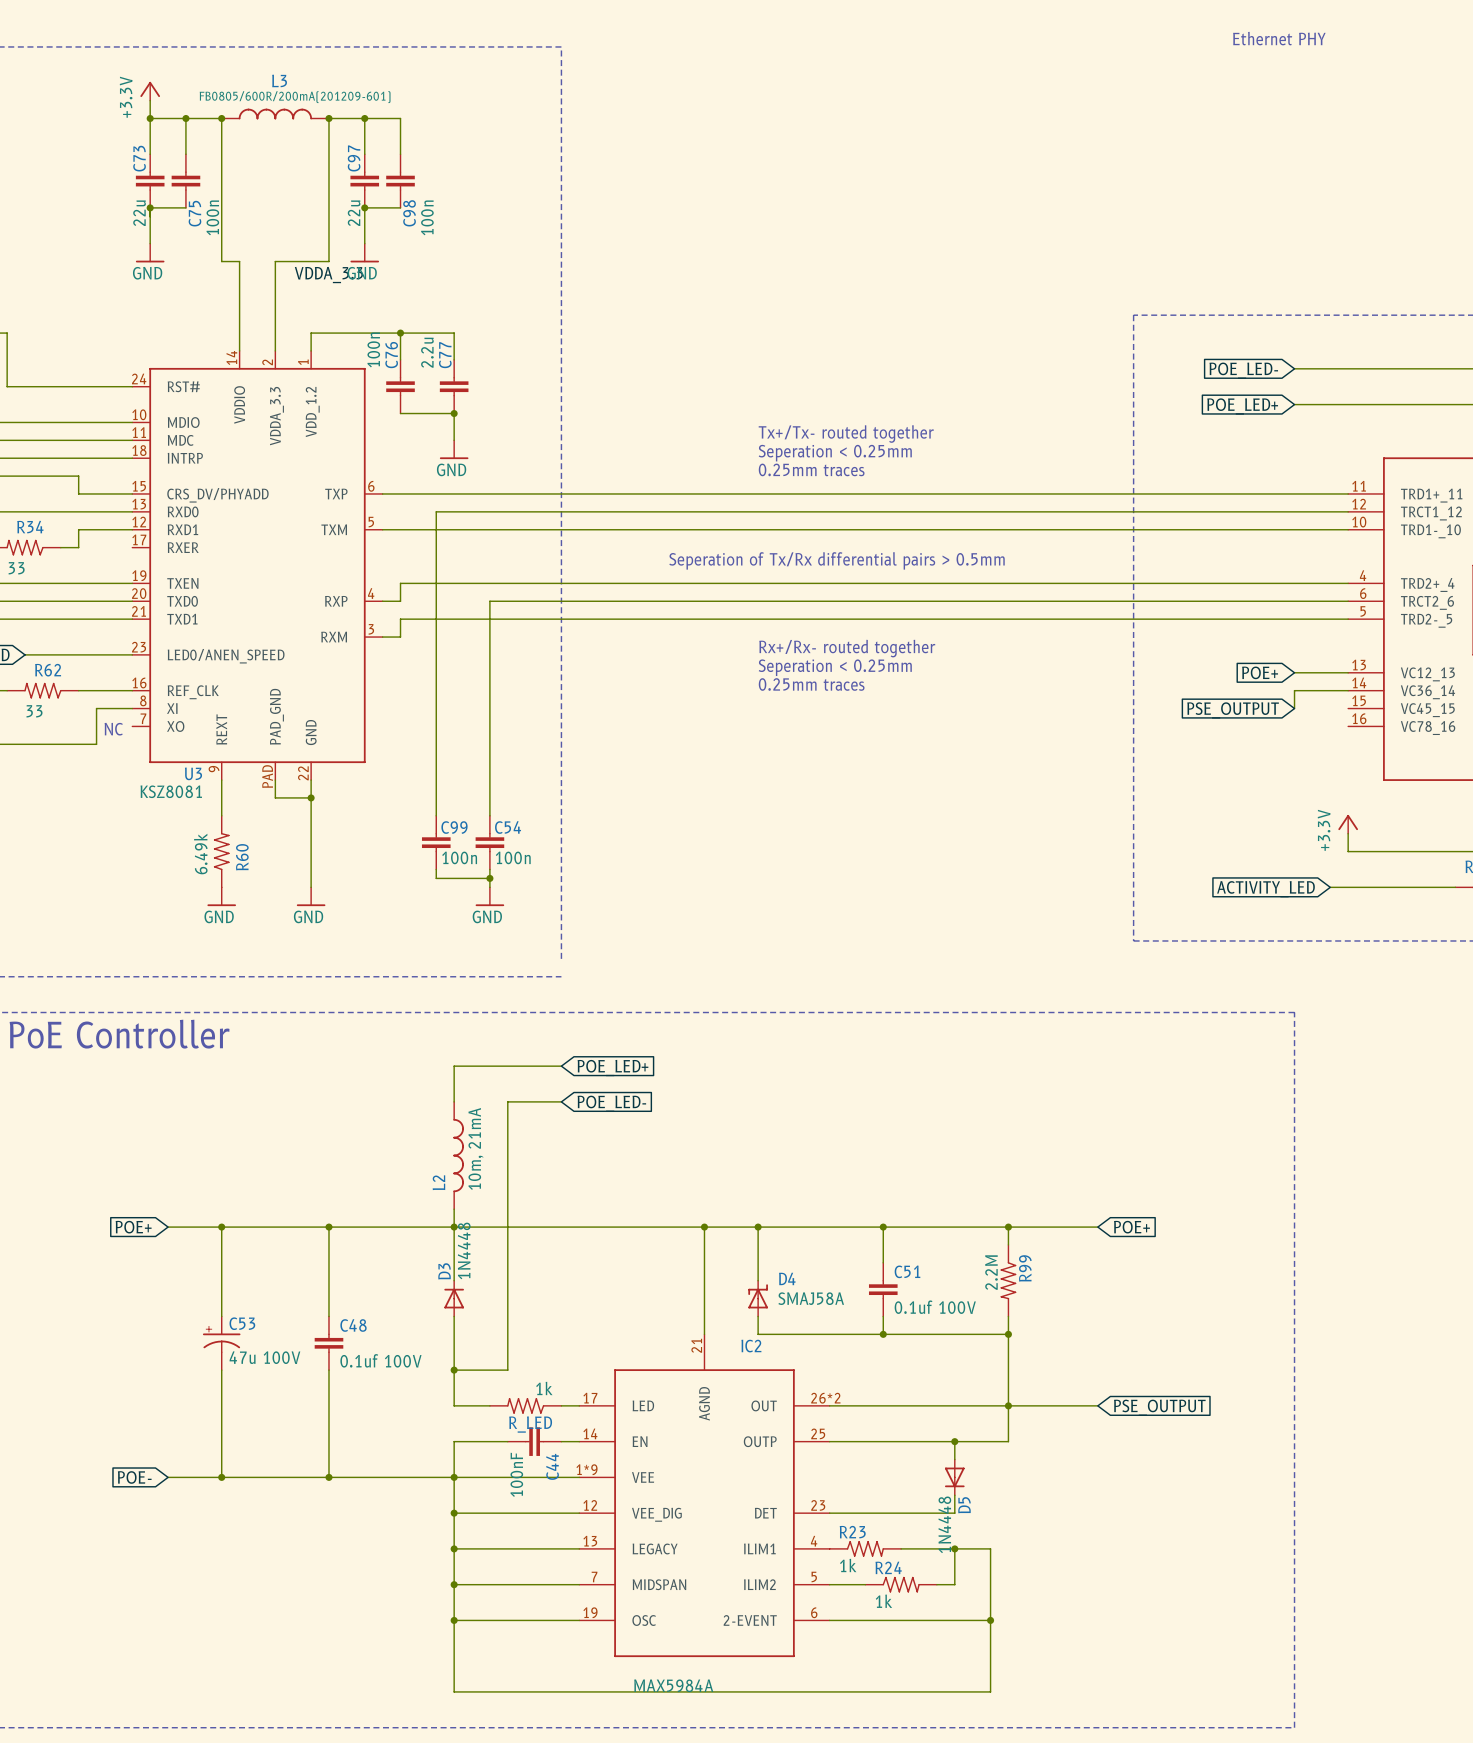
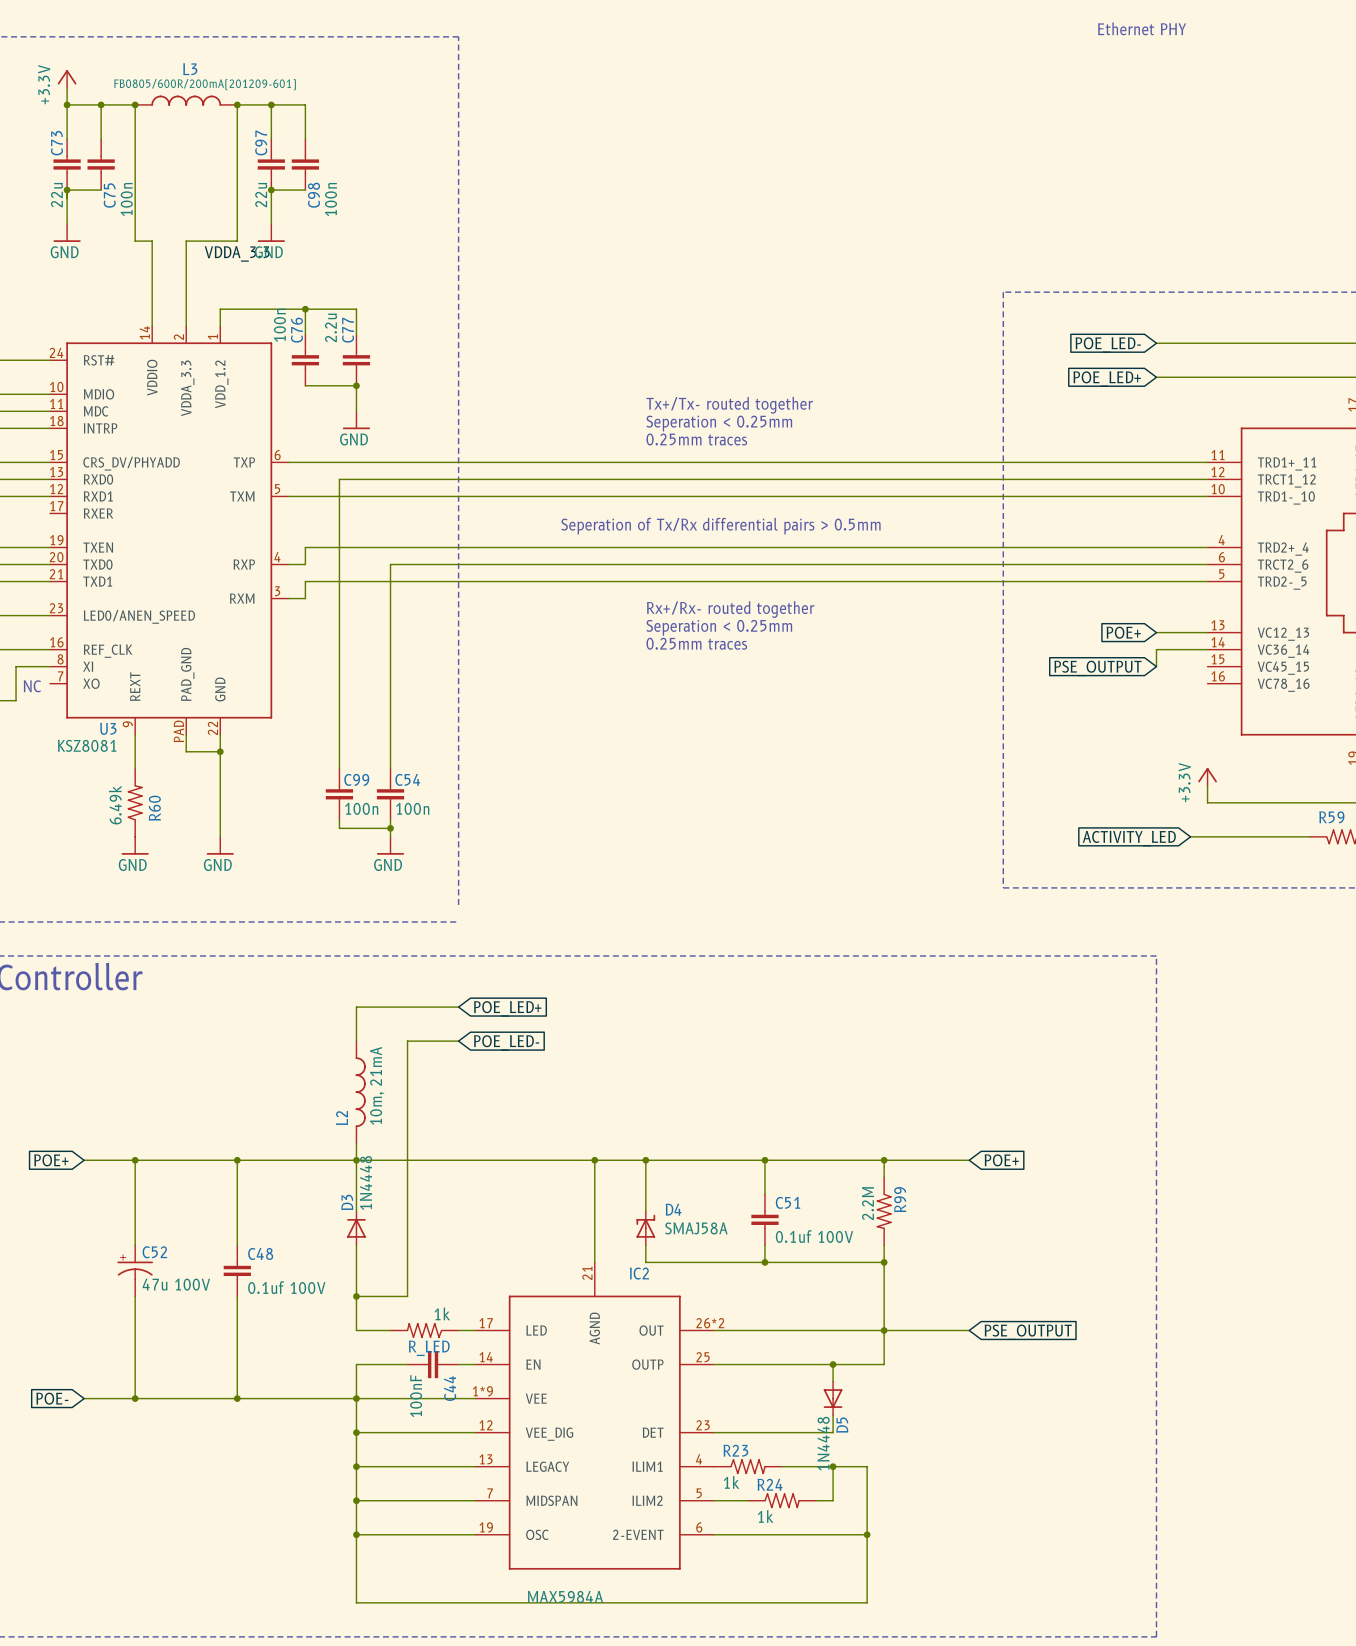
C53 name: C53 (242, 1323) -> C52 (154, 1252)

